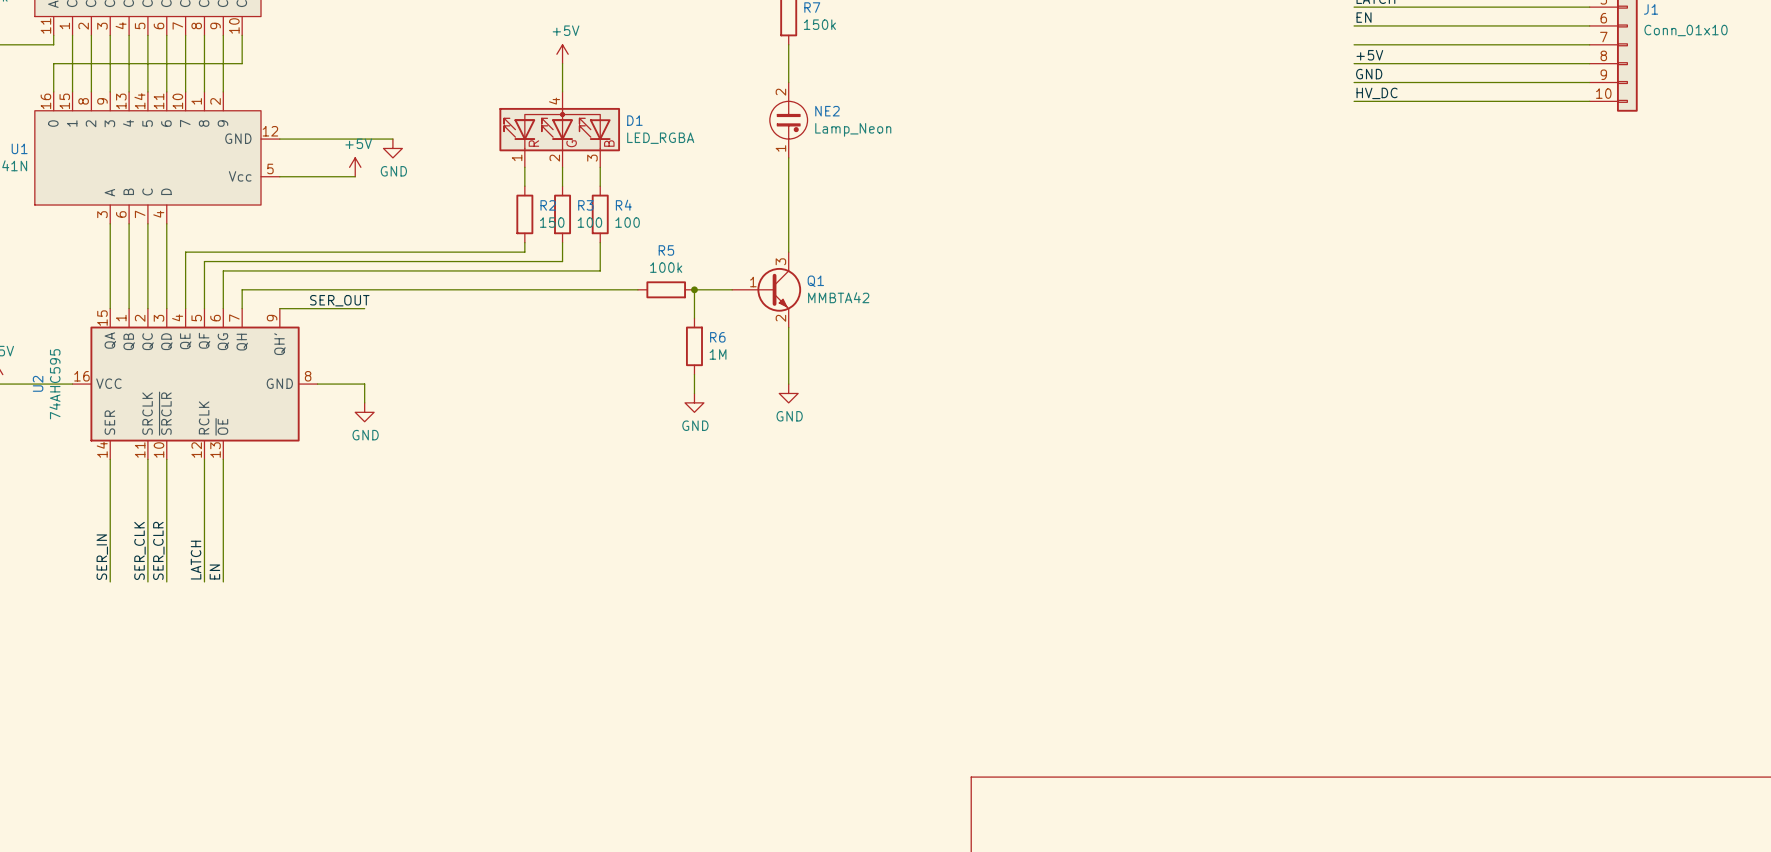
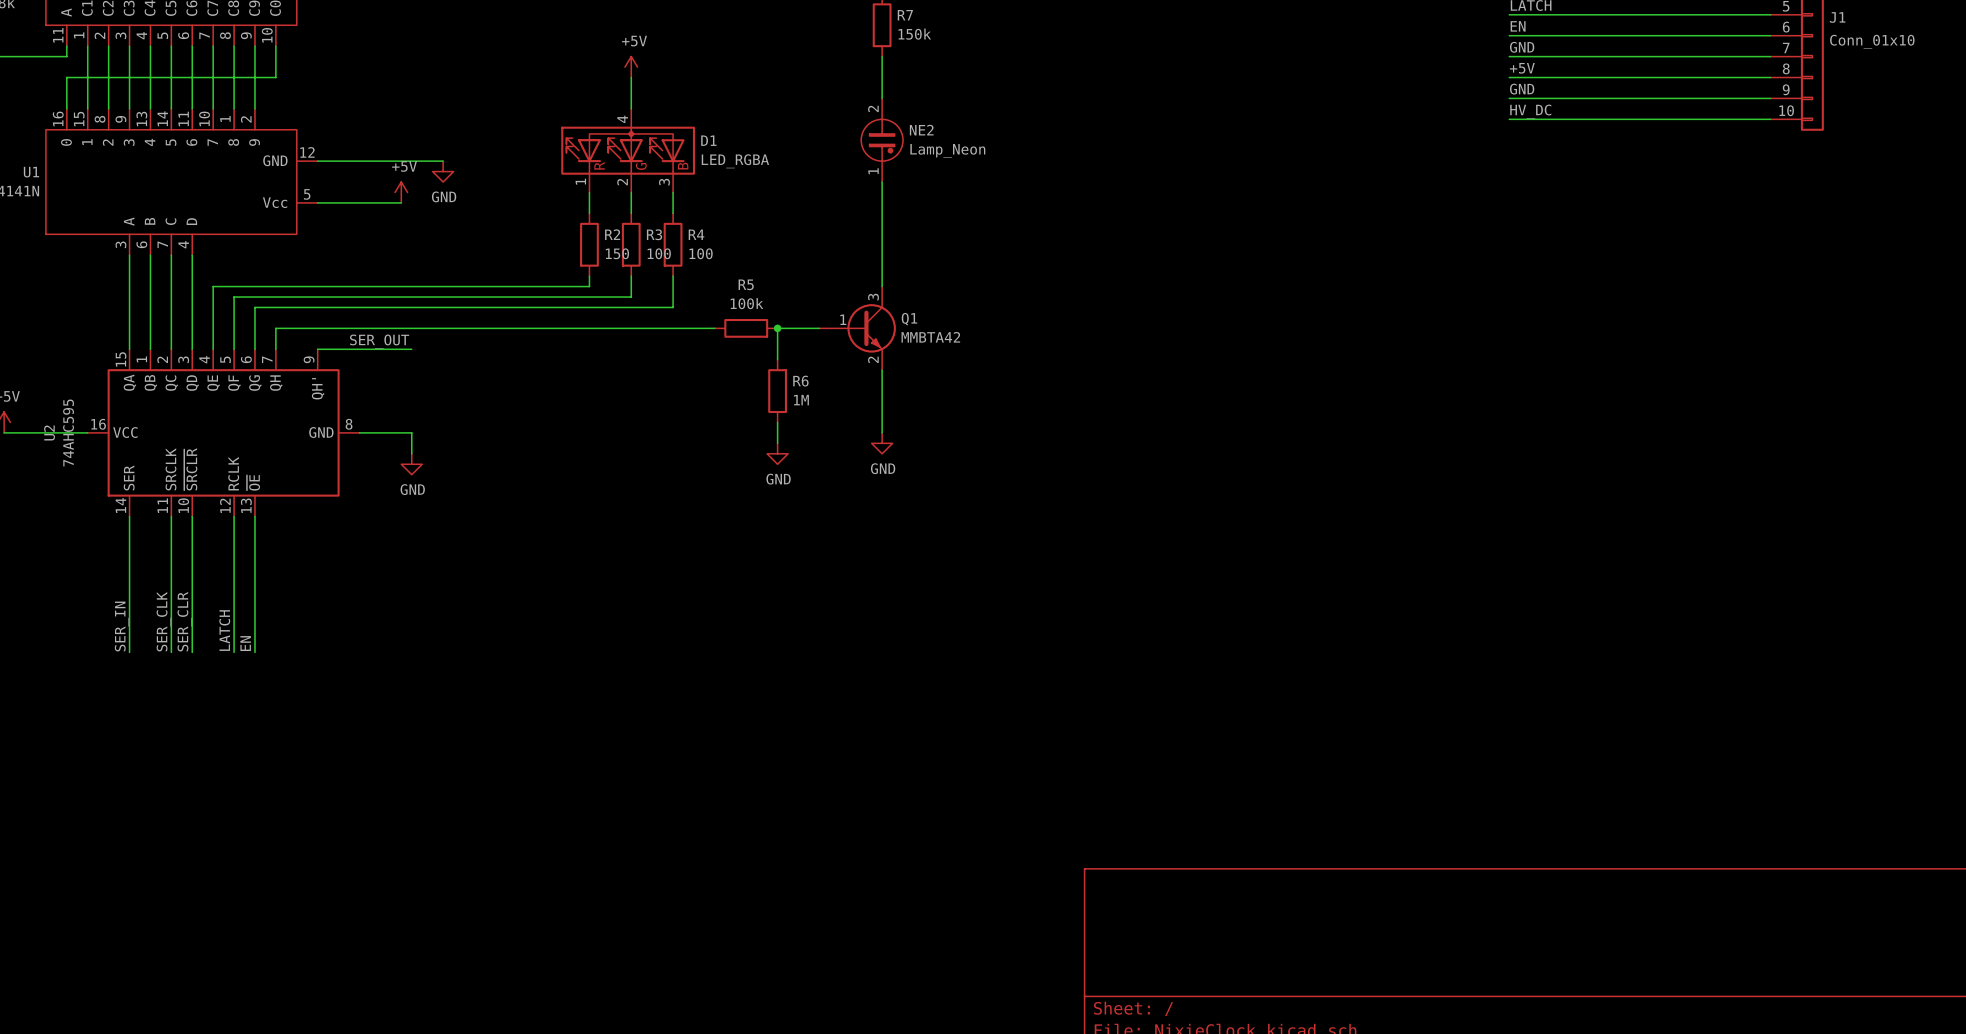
label: none -> GND (1522, 47)

